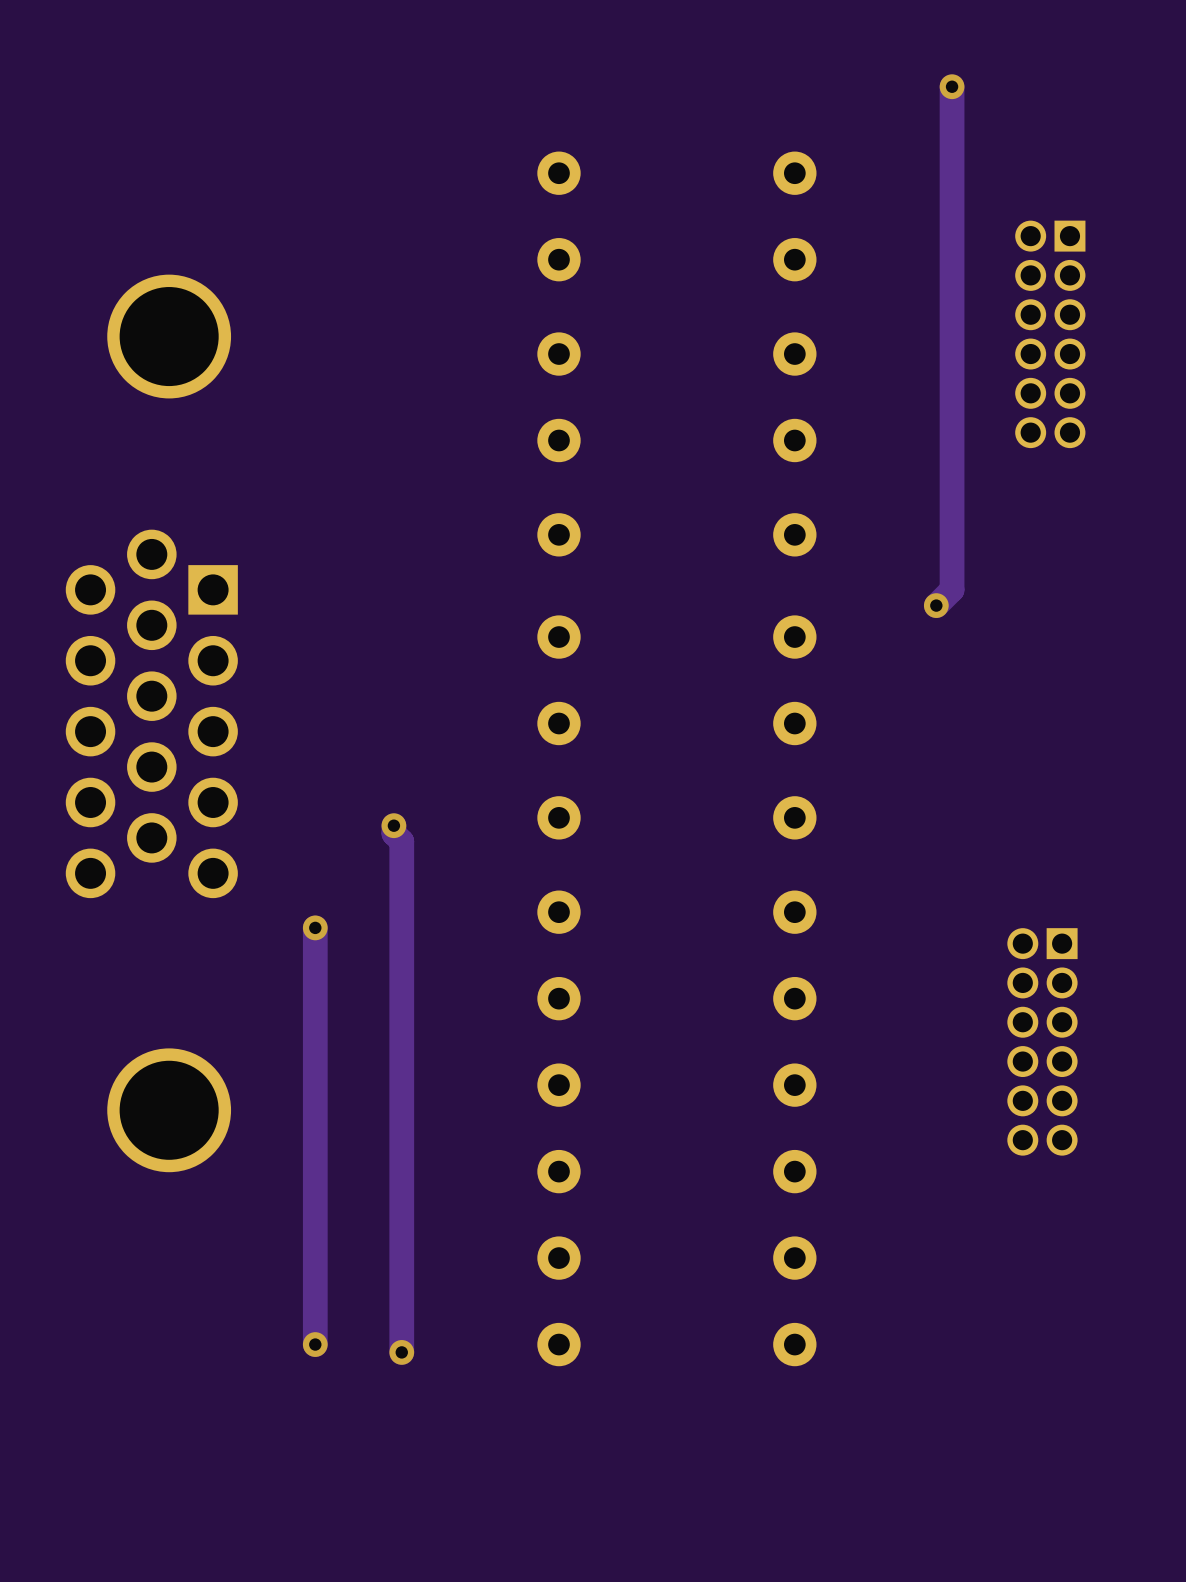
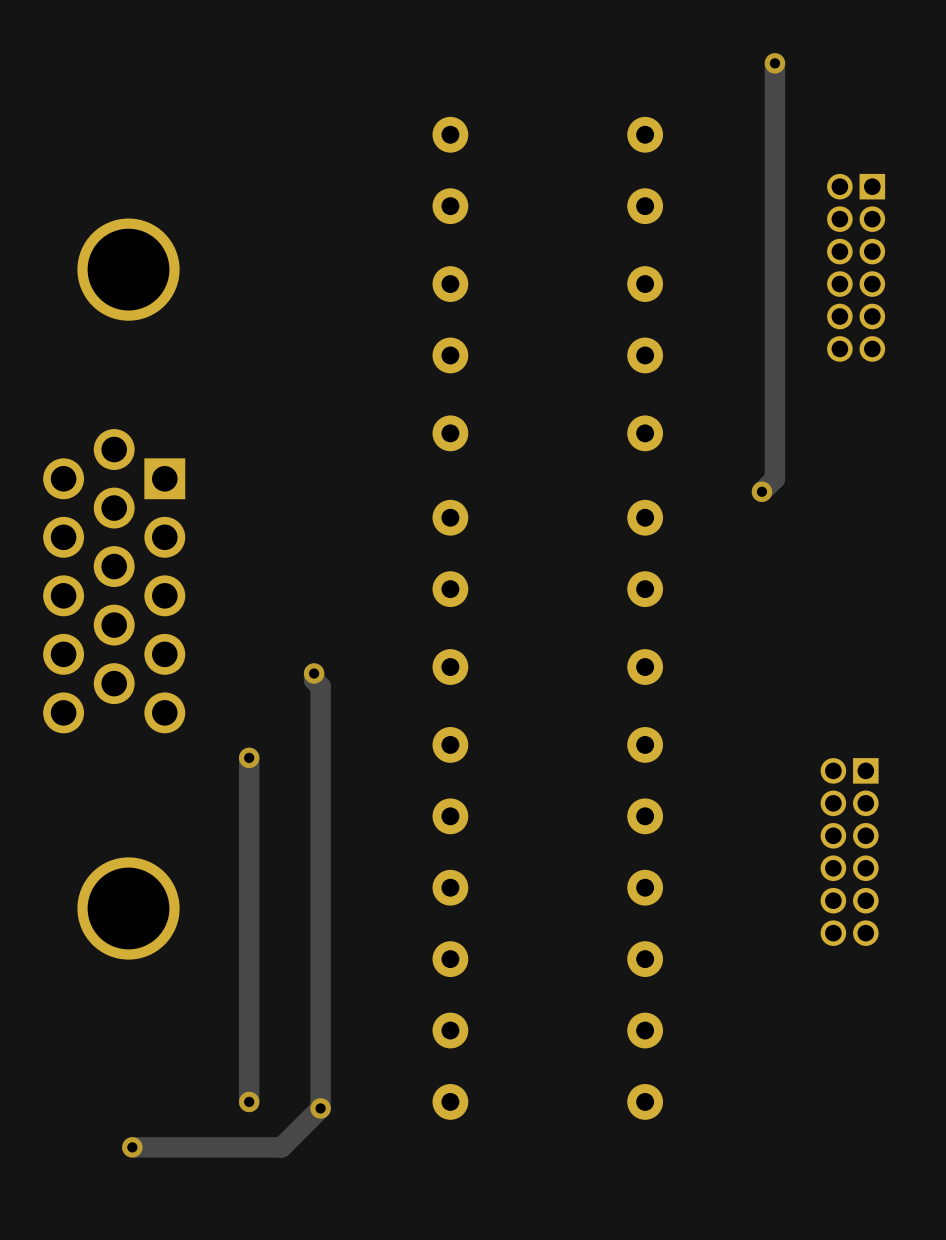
track: none -> (320, 1108) (281, 1147) (132, 1147)
via: none -> (132, 1147)

